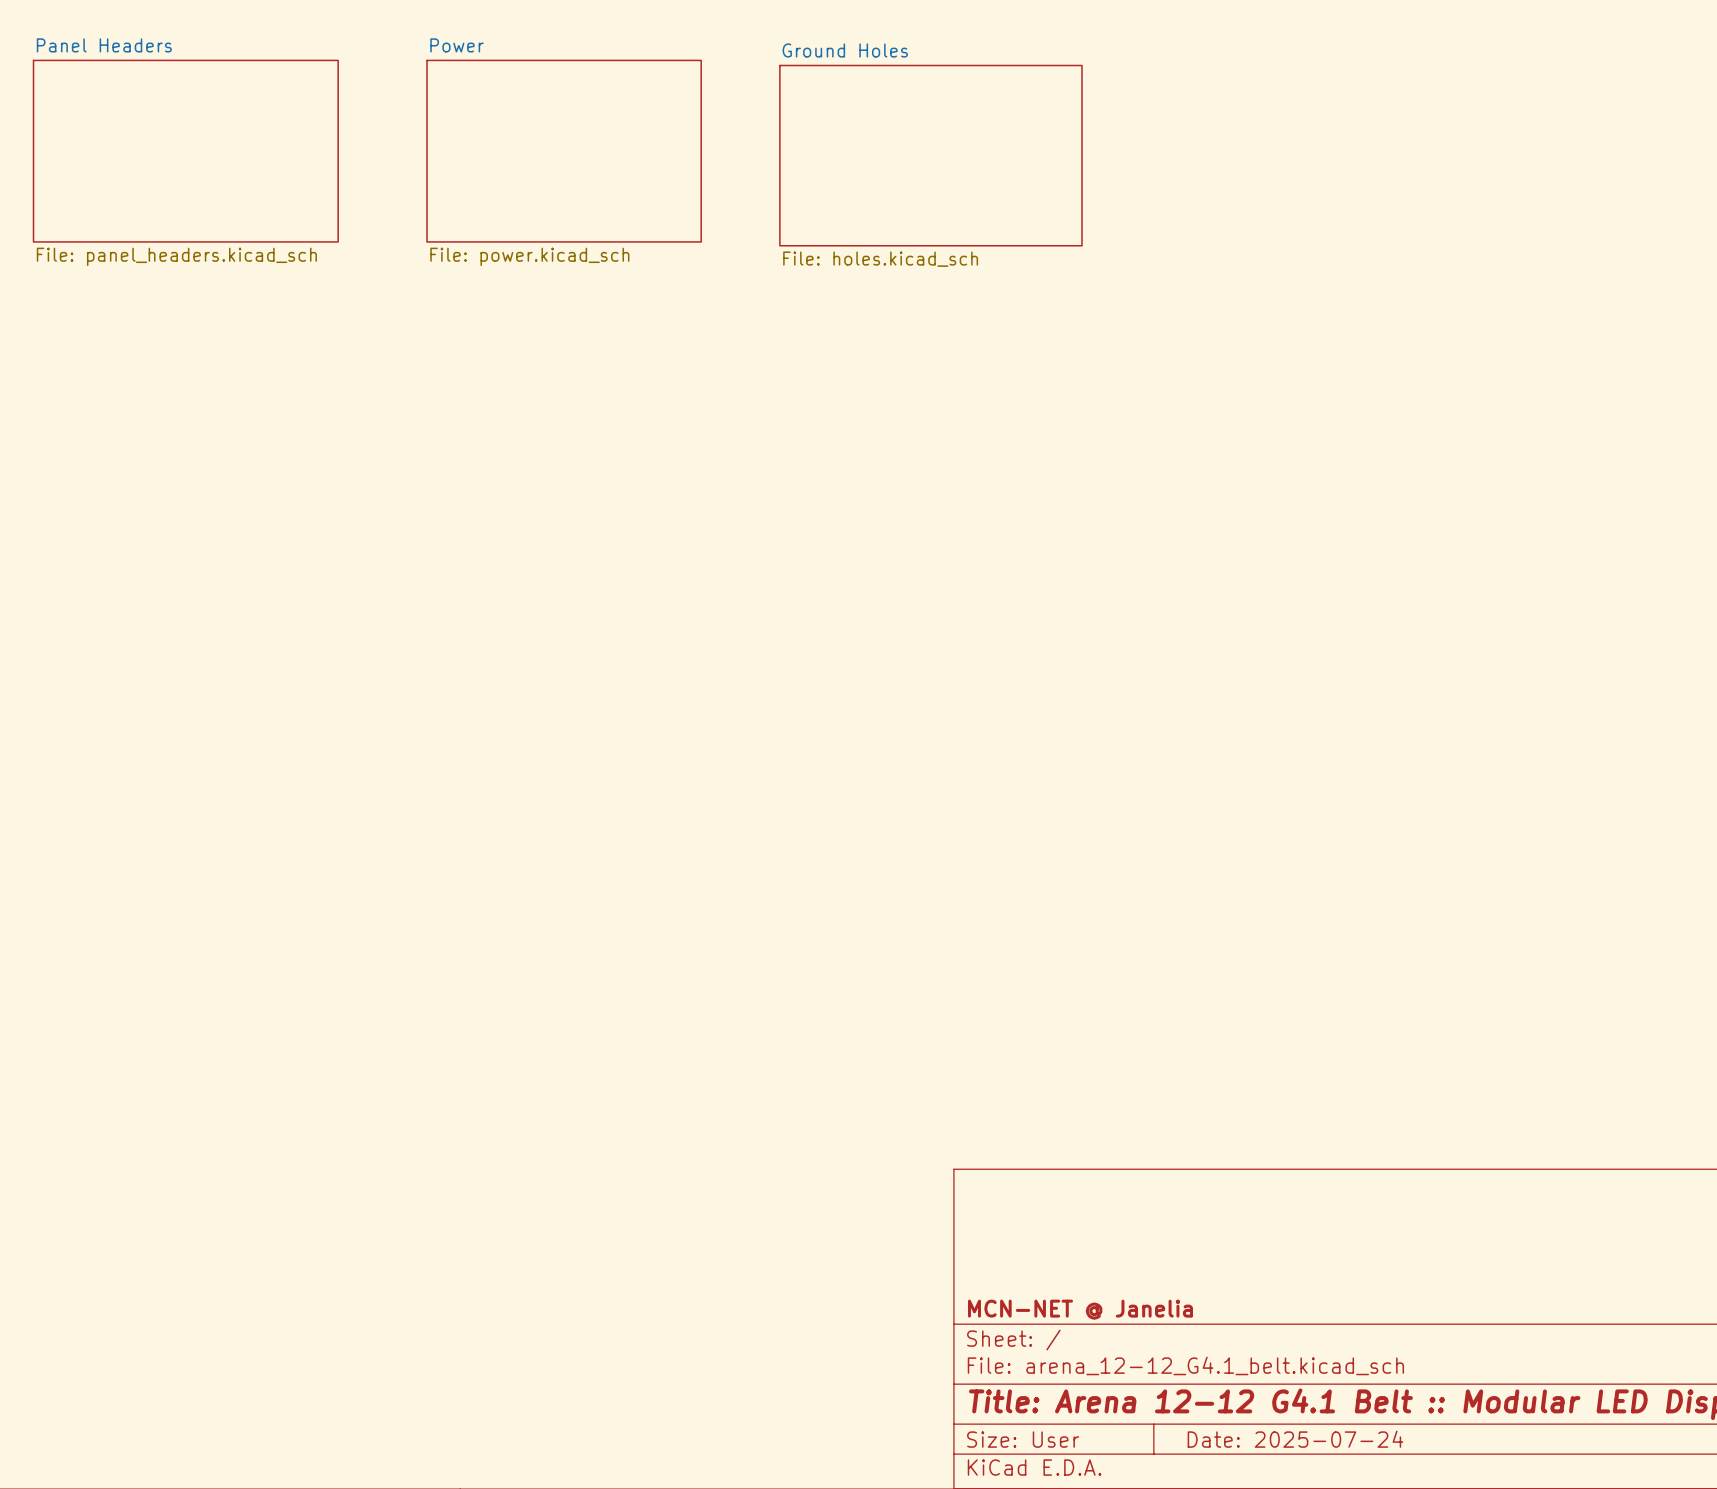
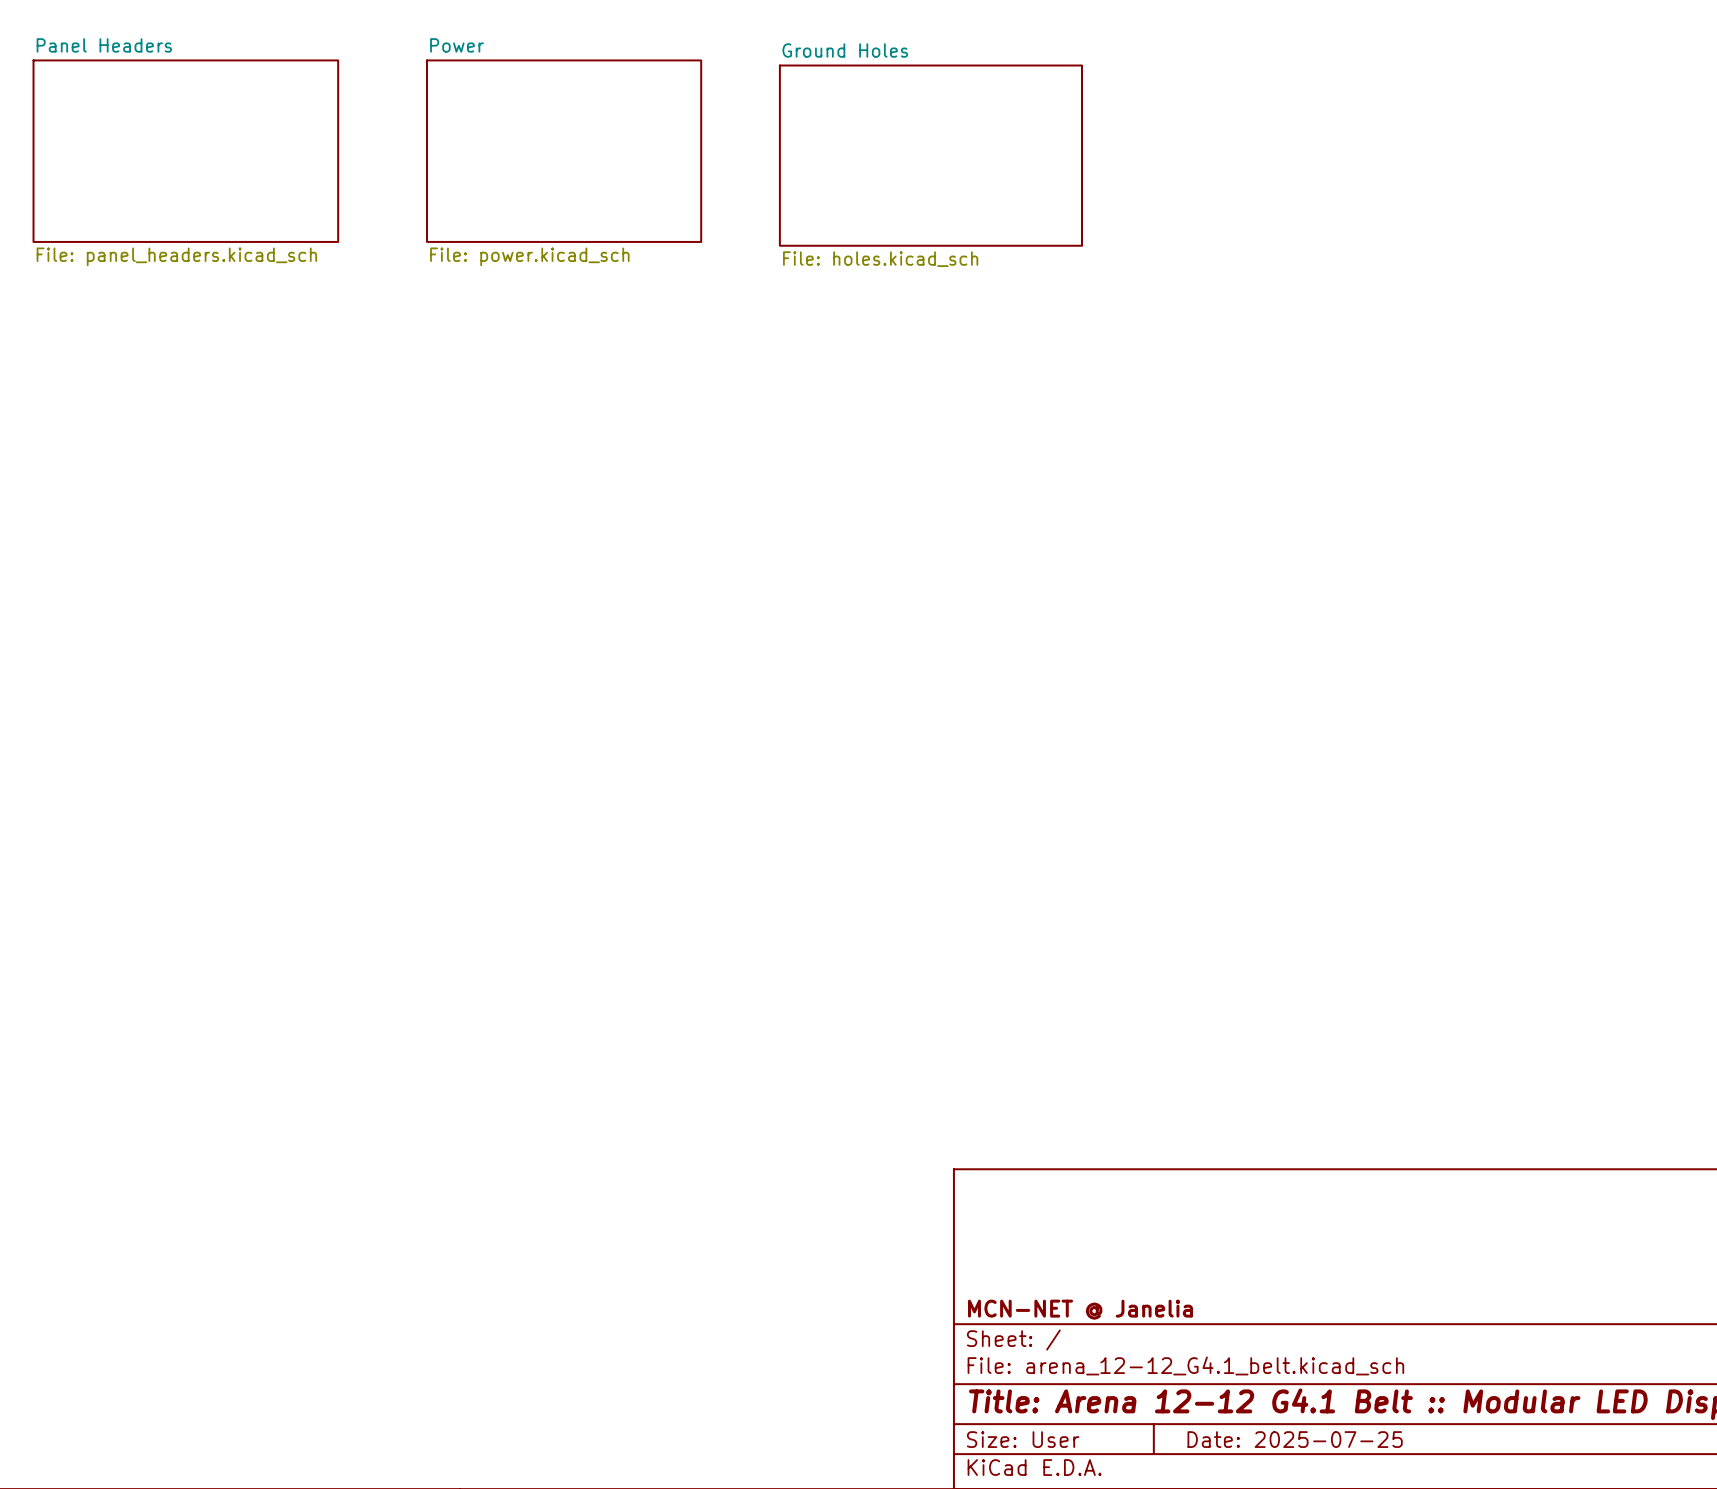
title block: Date: 2025-07-24 (1295, 1439) -> Date: 2025-07-25 (1295, 1439)

